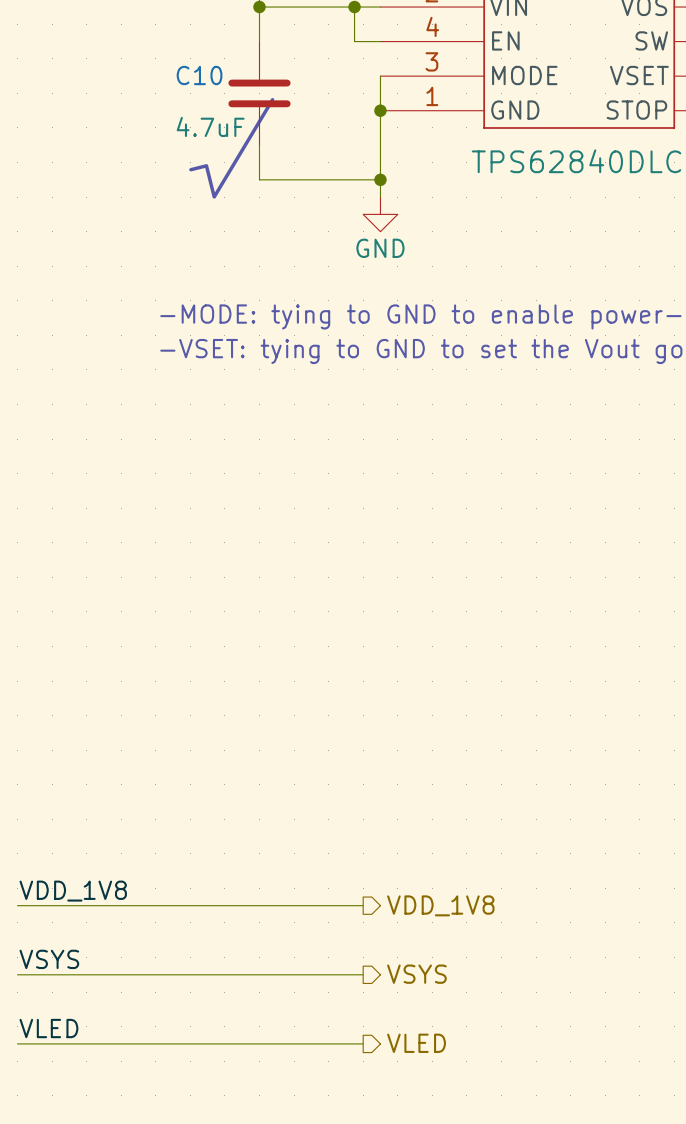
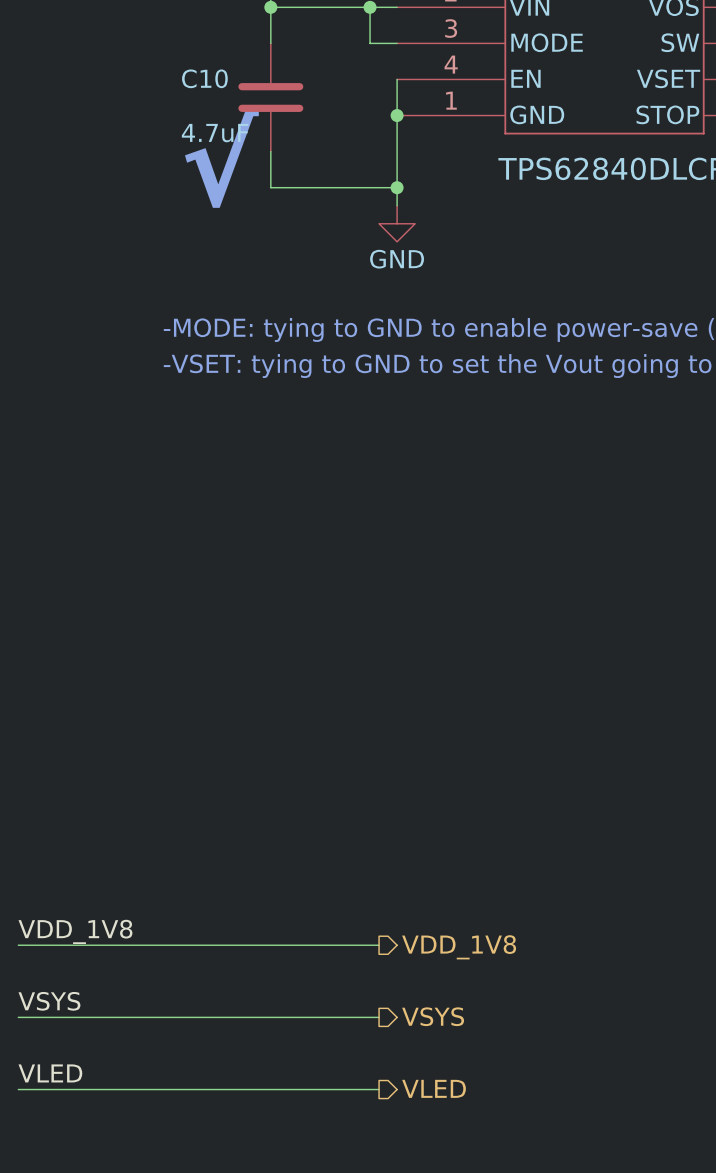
part pin number: 4 (432, 26) -> 3 (451, 28)
part pin name: EN (505, 40) -> MODE (547, 42)
part pin number: 3 (431, 61) -> 4 (451, 64)
part pin name: MODE (524, 75) -> EN (525, 78)

